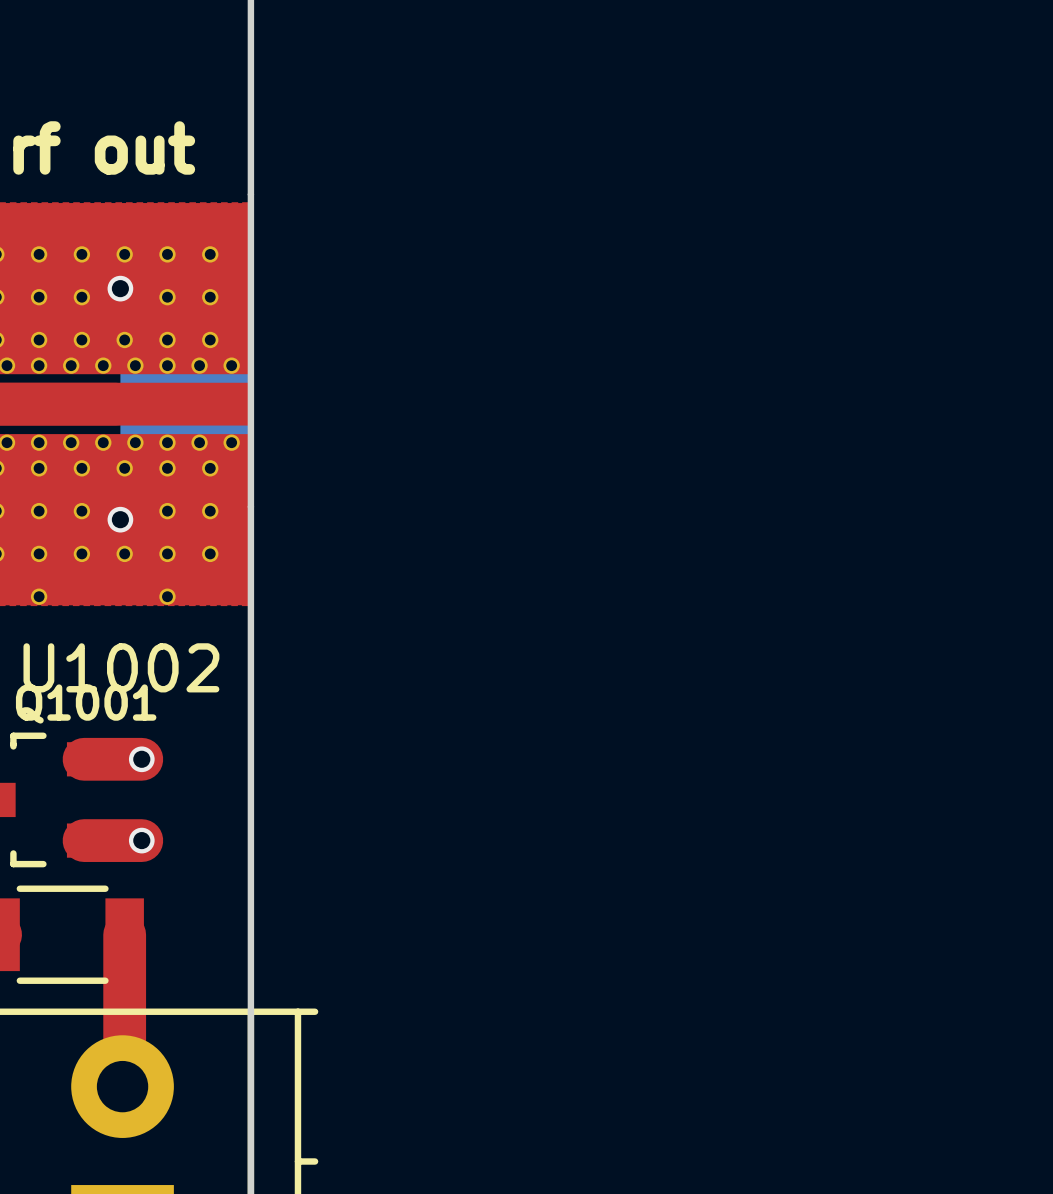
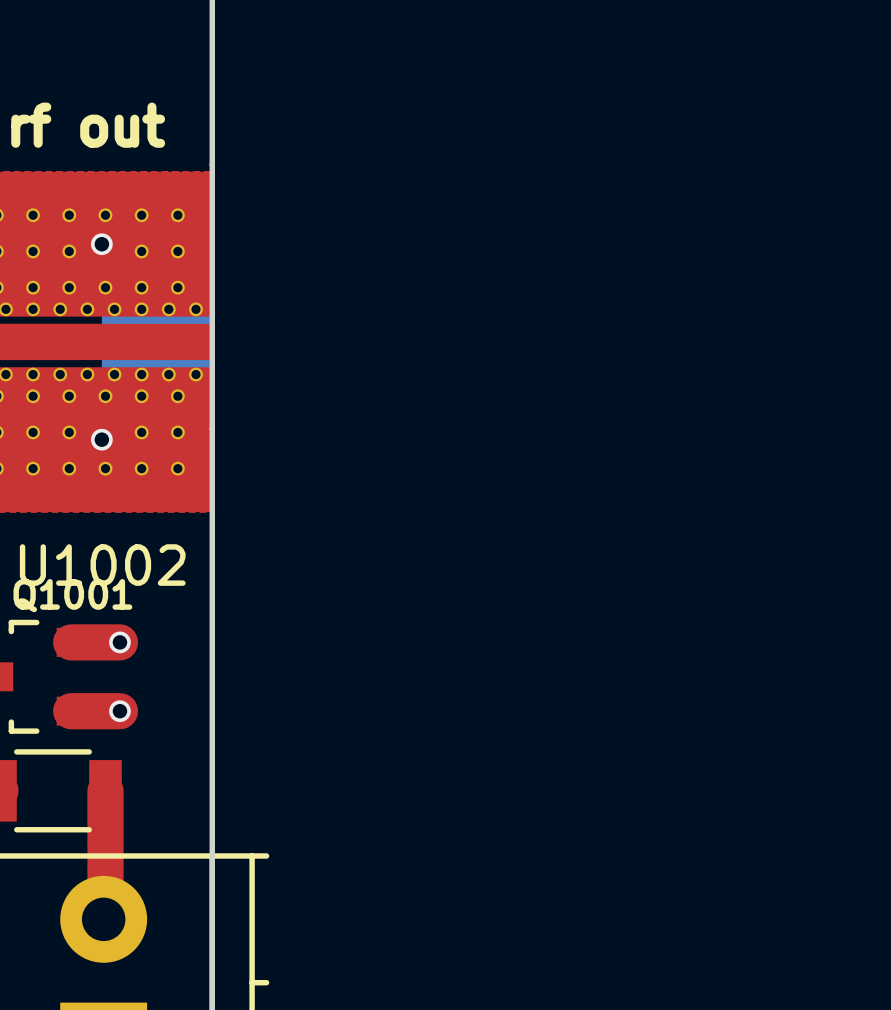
part: (39, 596) -> none
part: (167, 596) -> none

